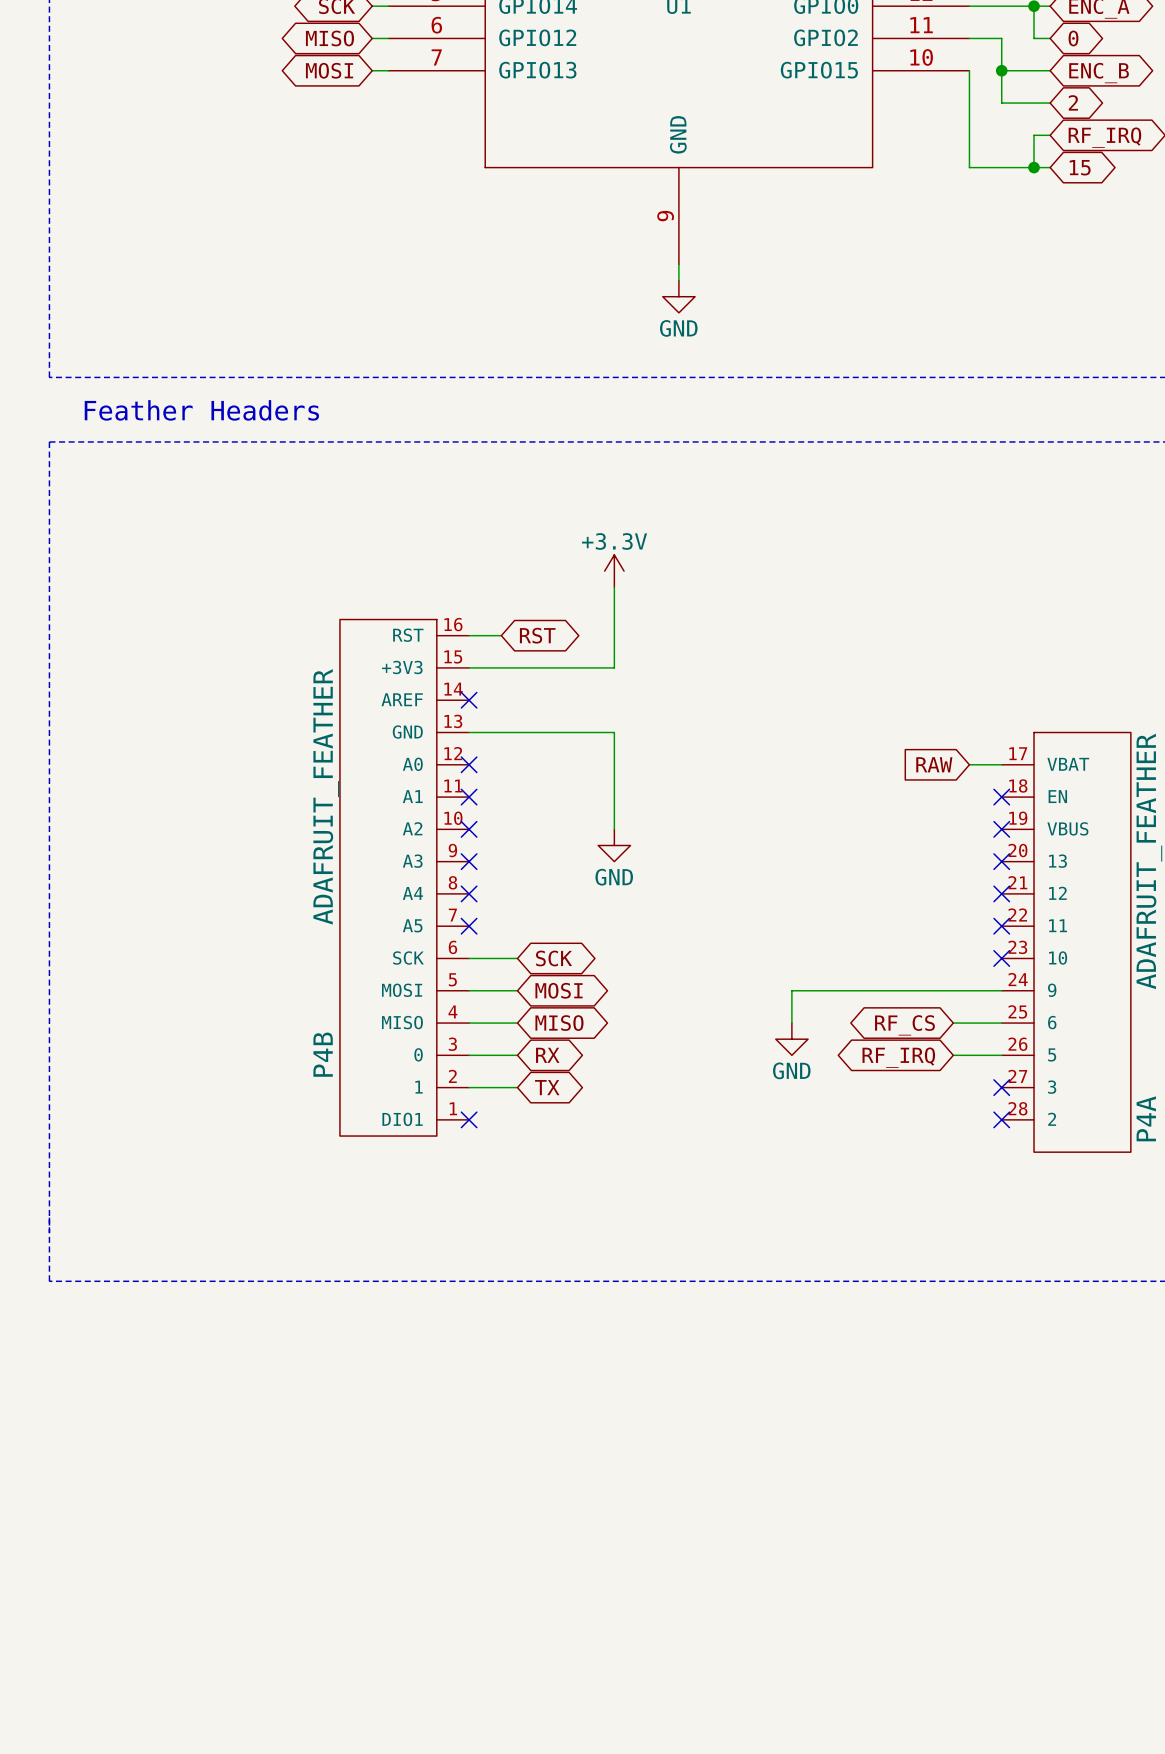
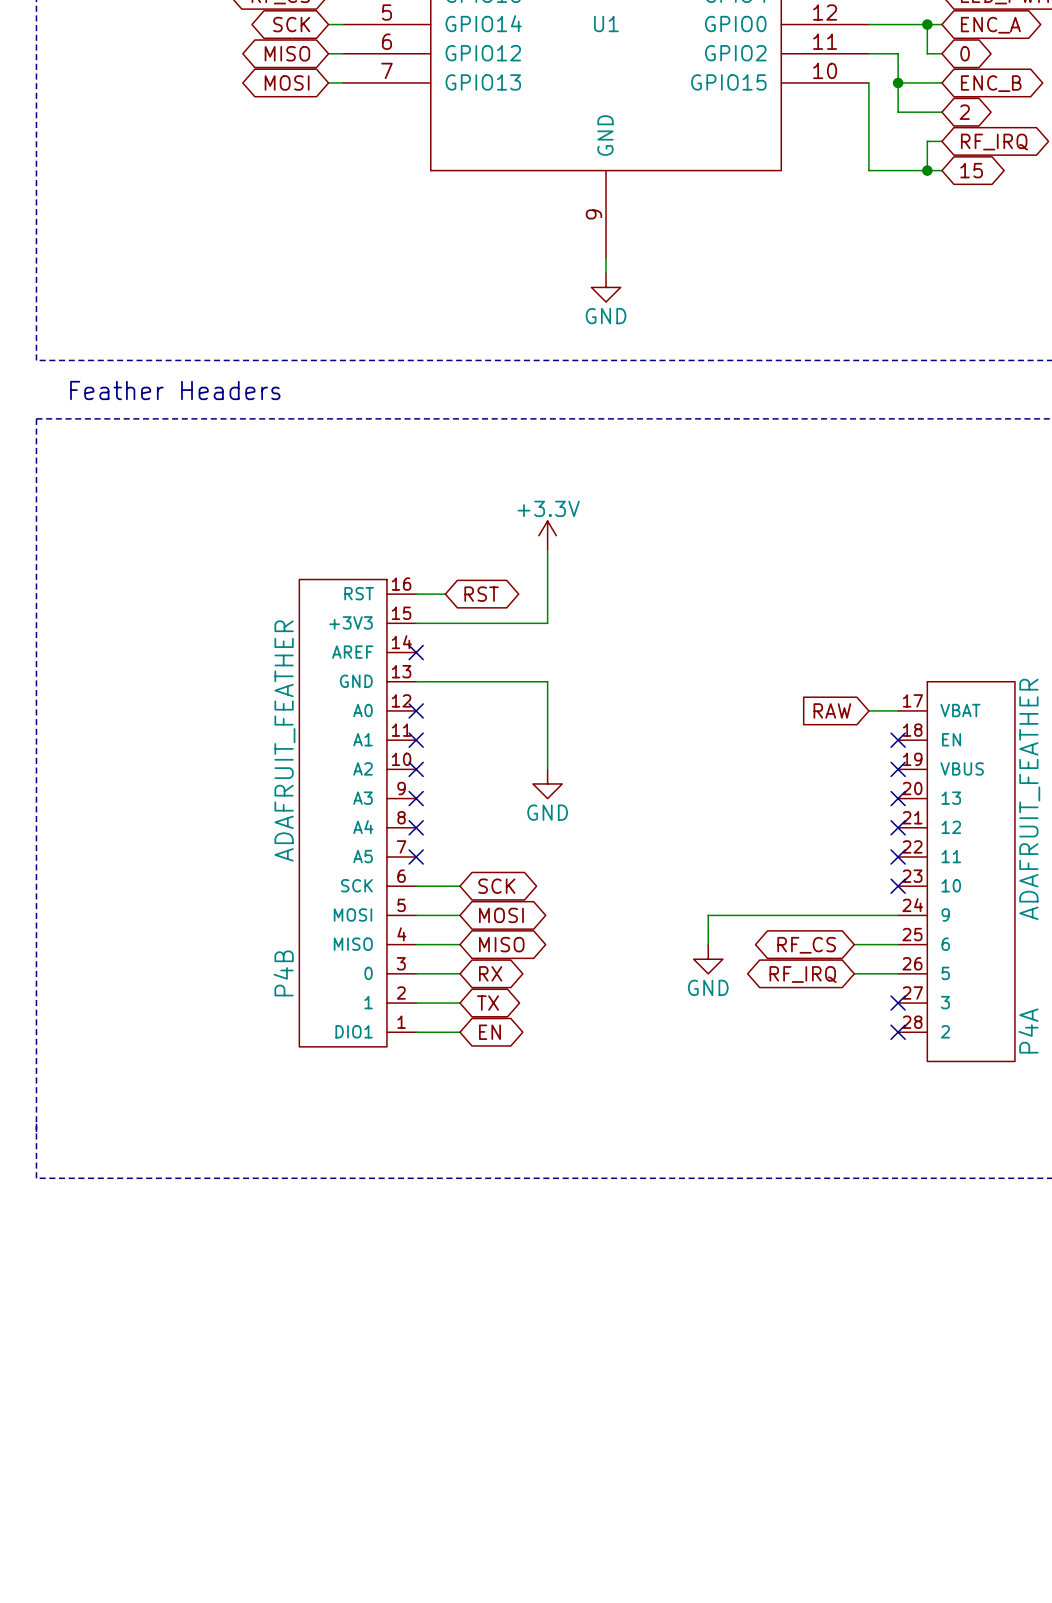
wire: none -> (416, 1032) (459, 1032)
no-connect mark: (469, 1119) -> none
global label: none -> EN (489, 1032)

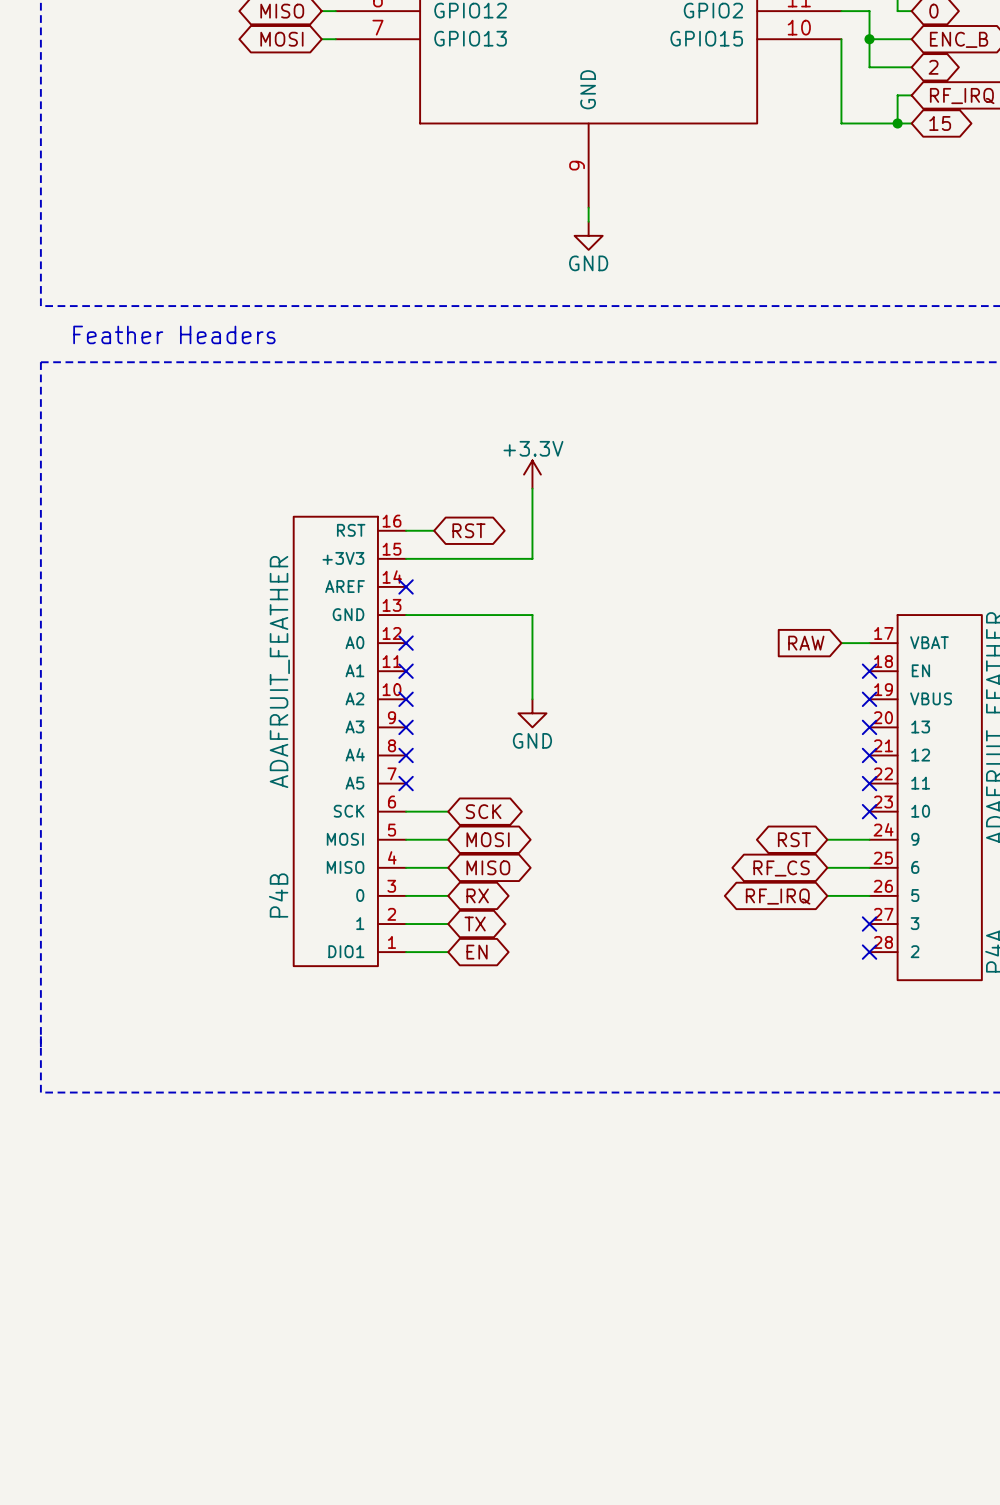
global label: none -> RST (794, 839)
wire: (854, 915) (708, 915) (708, 944) -> none
power symbol: GND (708, 959) -> none

